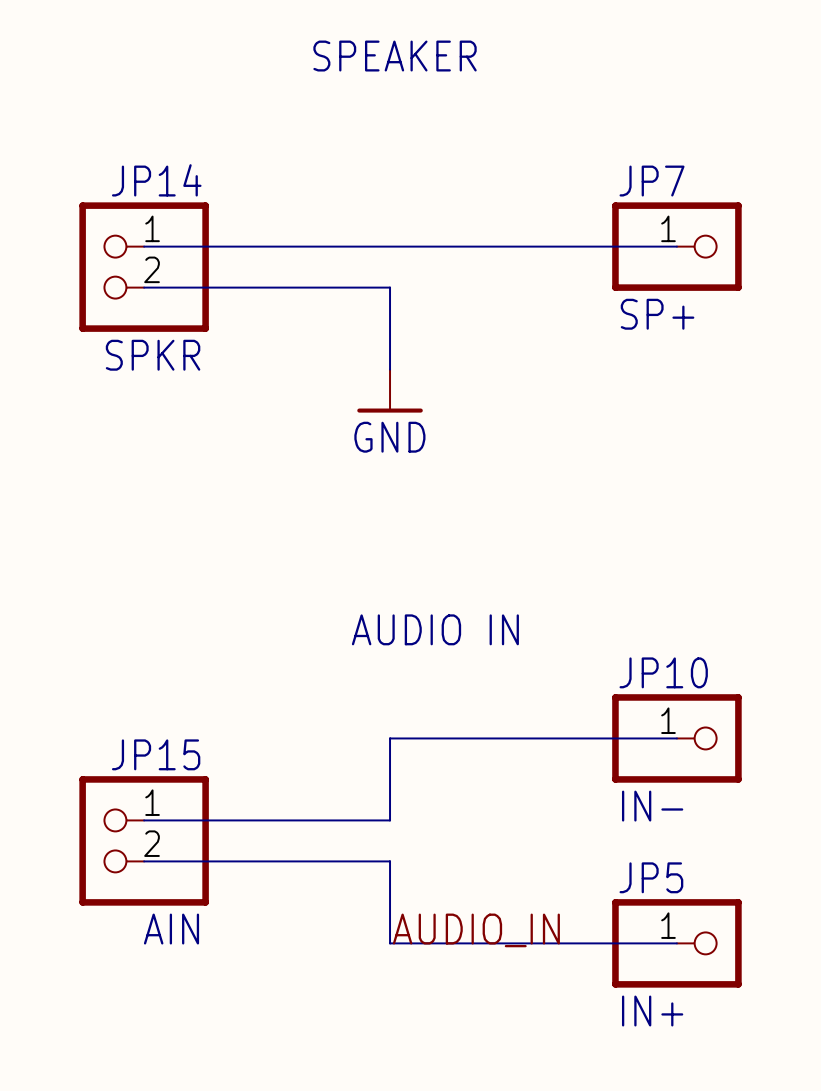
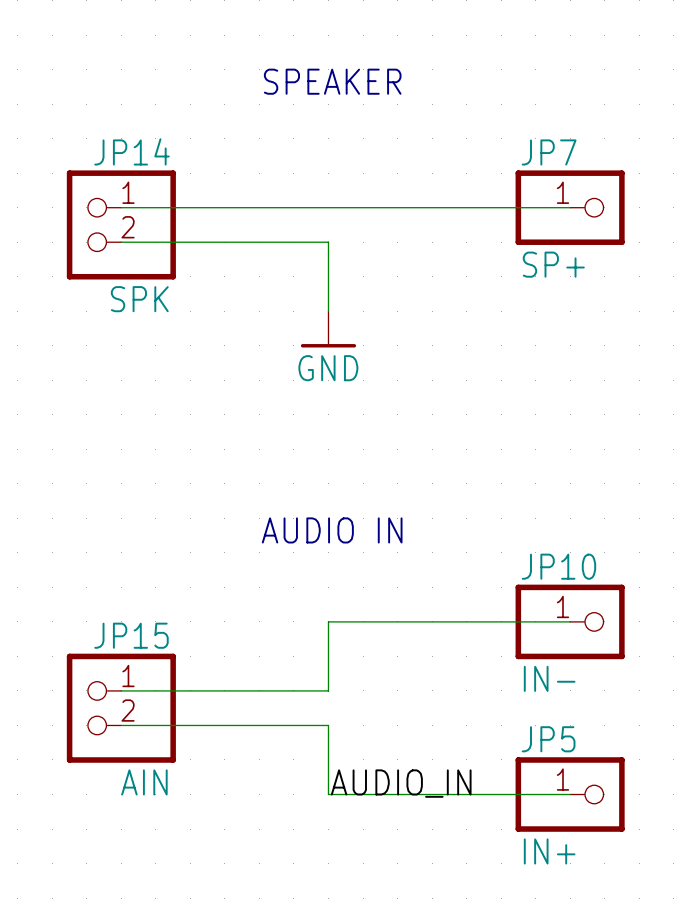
text position: SPEAKER (395, 56) -> SPEAKER (332, 81)
JP14 value: SPKR (153, 355) -> SPK (139, 299)
text position: AUDIO IN (435, 629) -> AUDIO IN (332, 530)

